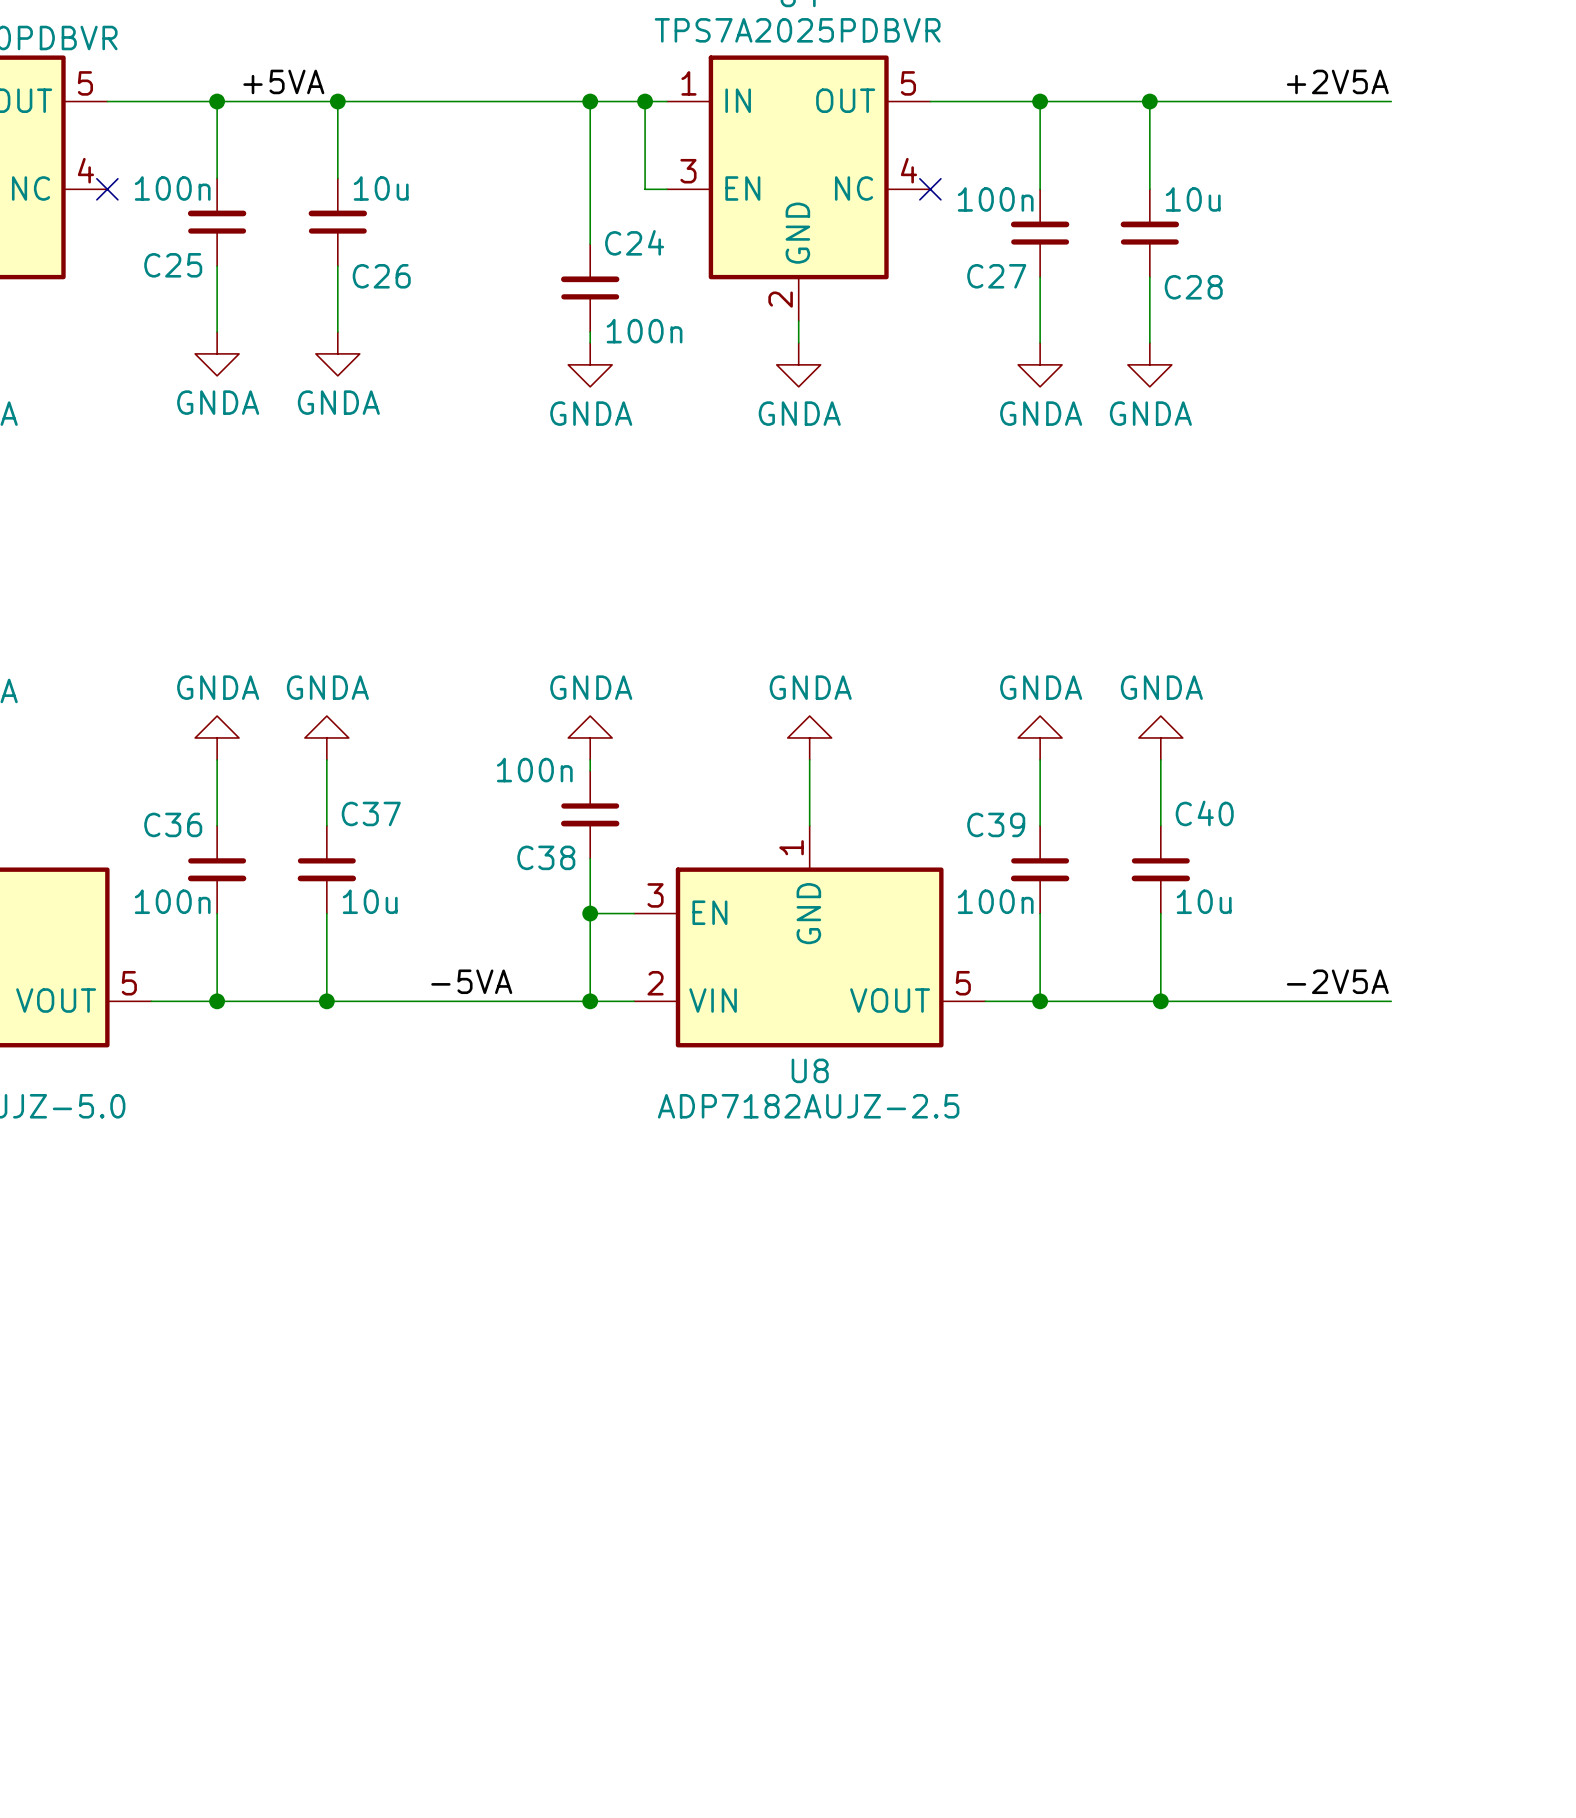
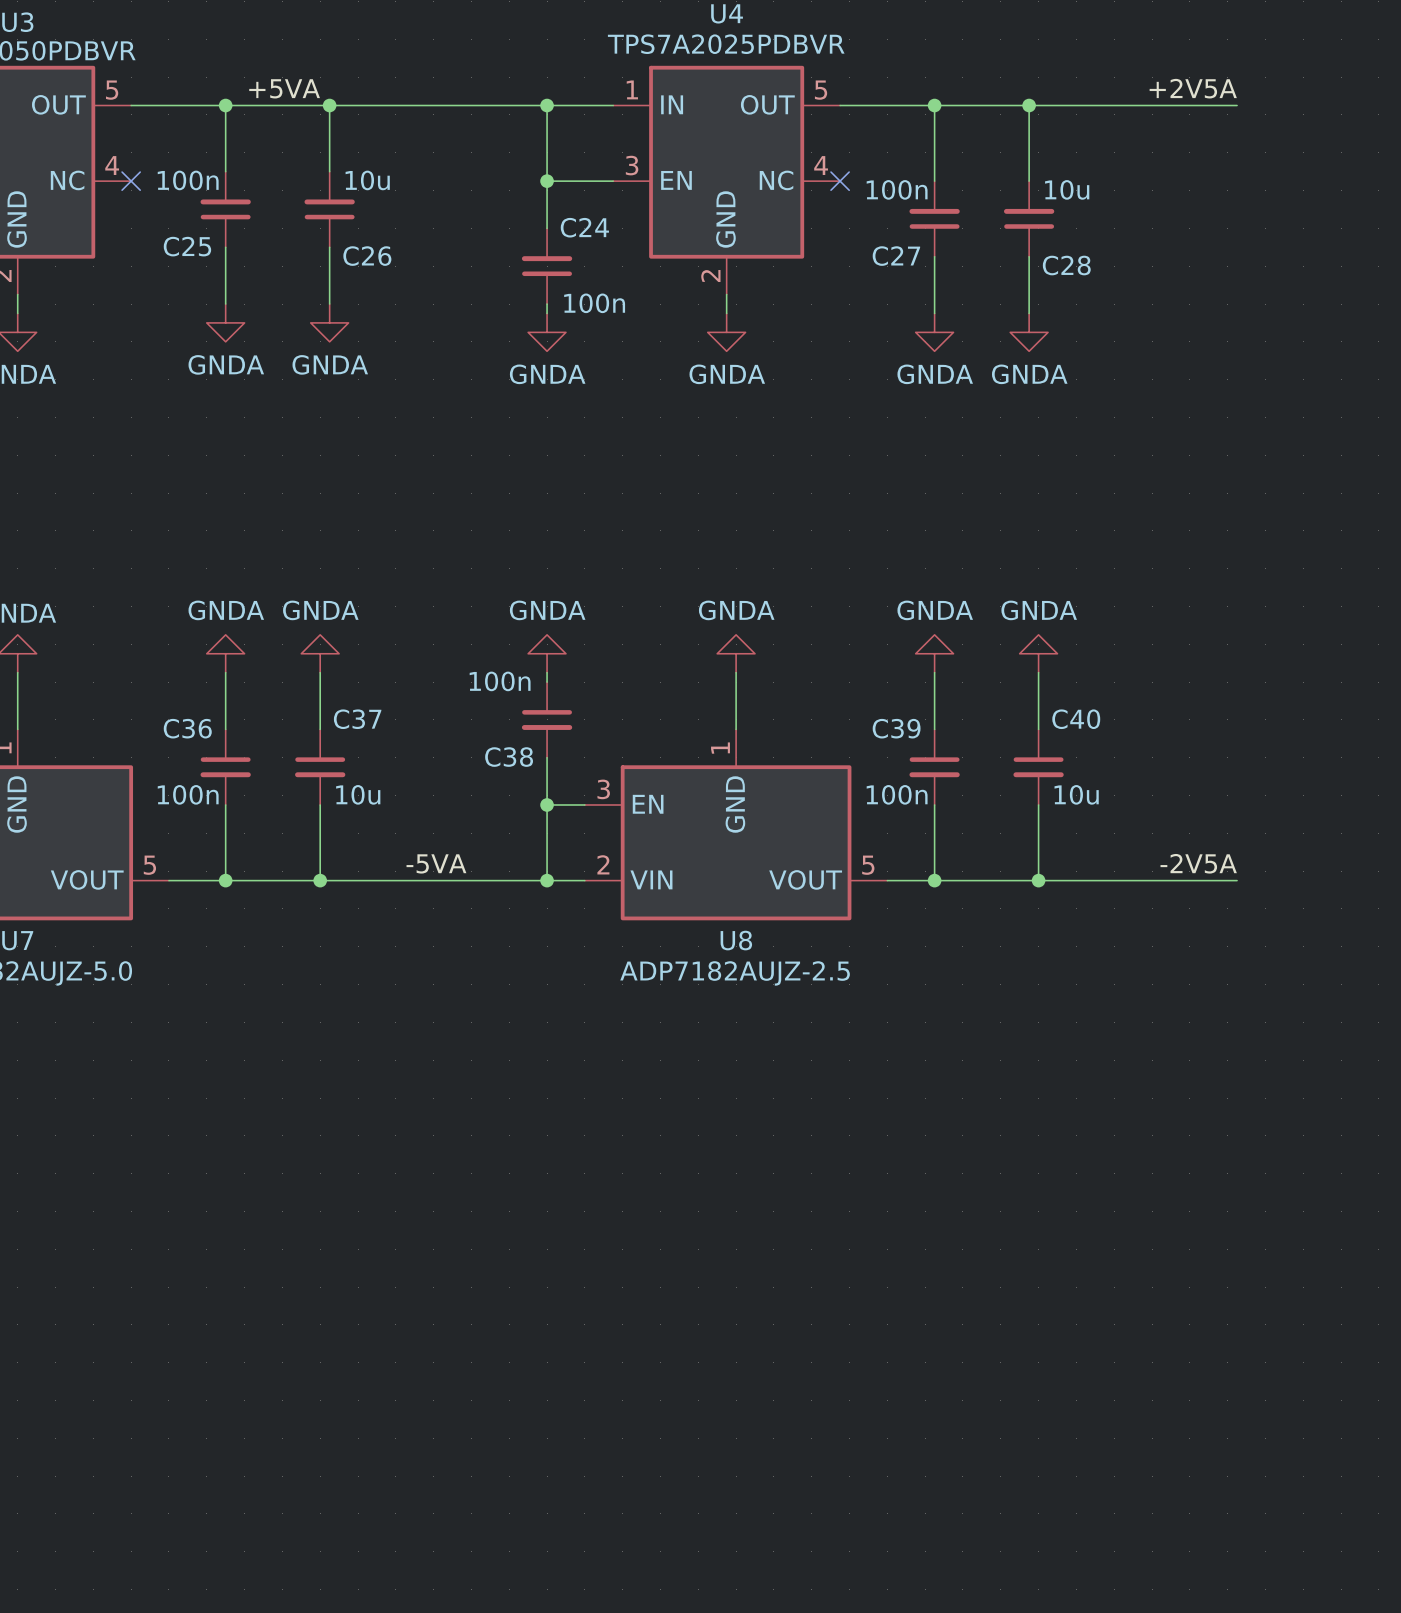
wire: (645, 101) (645, 189) -> (547, 181) (594, 181)
junction position: (645, 101) -> (547, 181)

